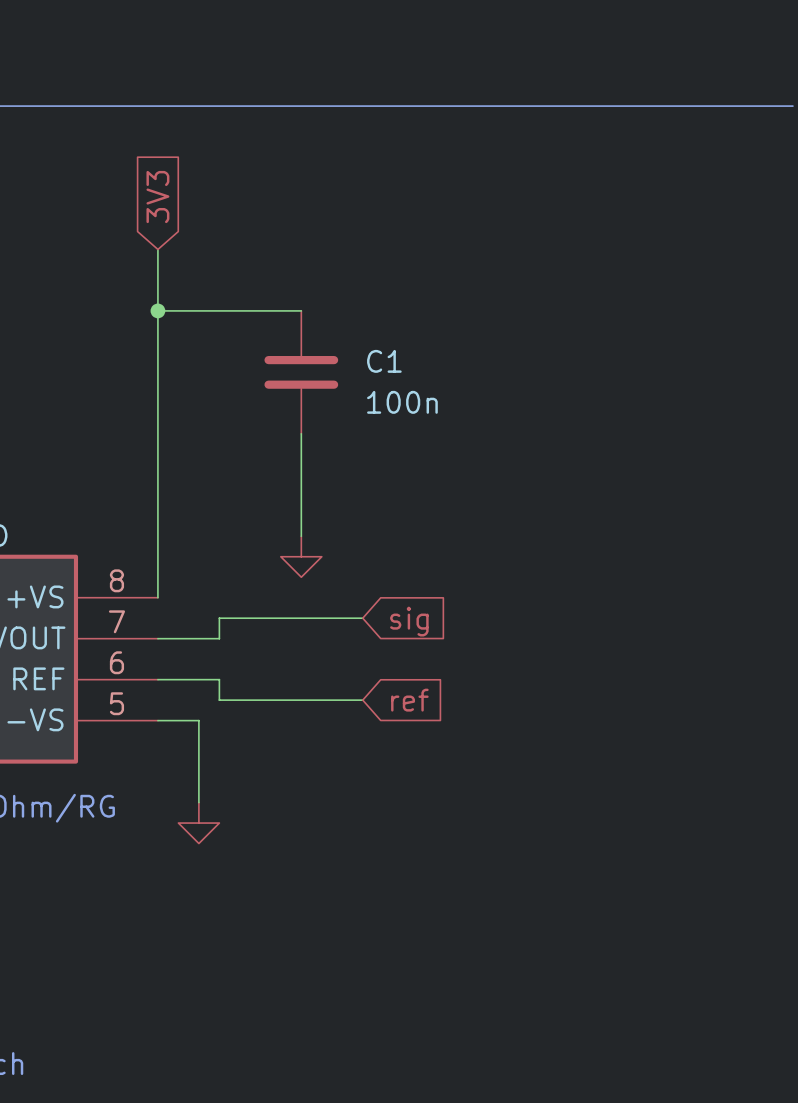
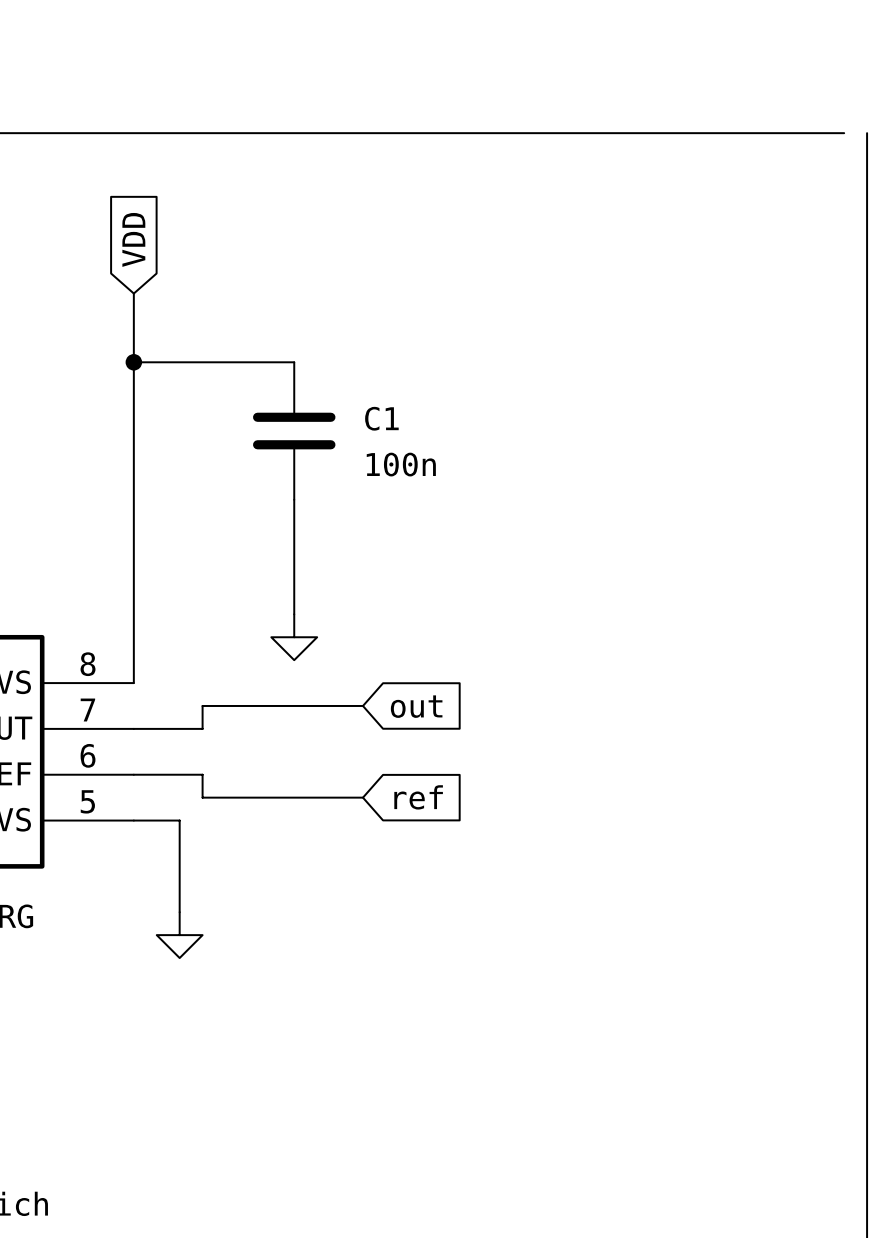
global label: 3V3 (157, 197) -> VDD (133, 239)
global label: sig (409, 621) -> out (416, 706)

